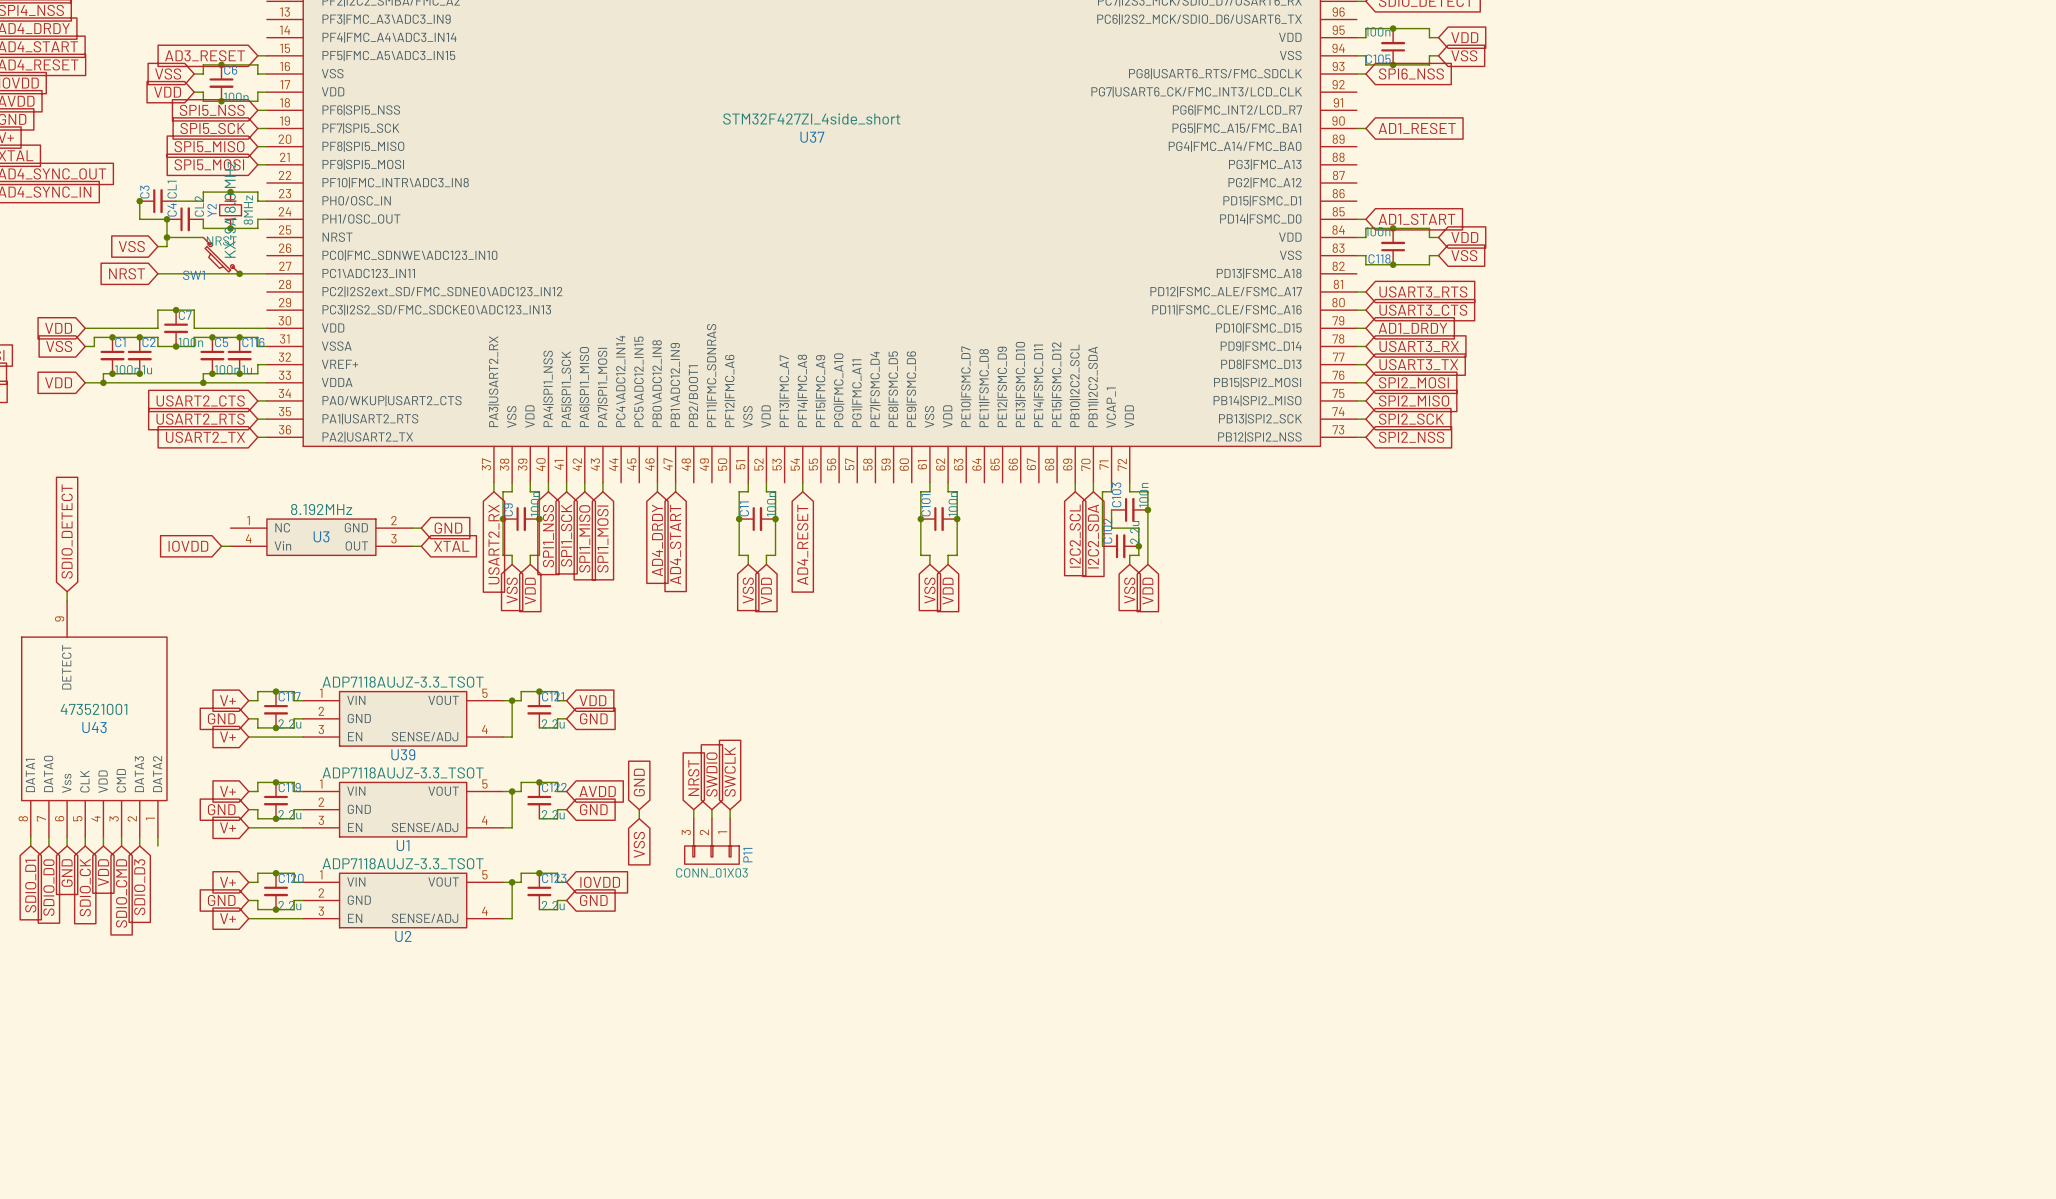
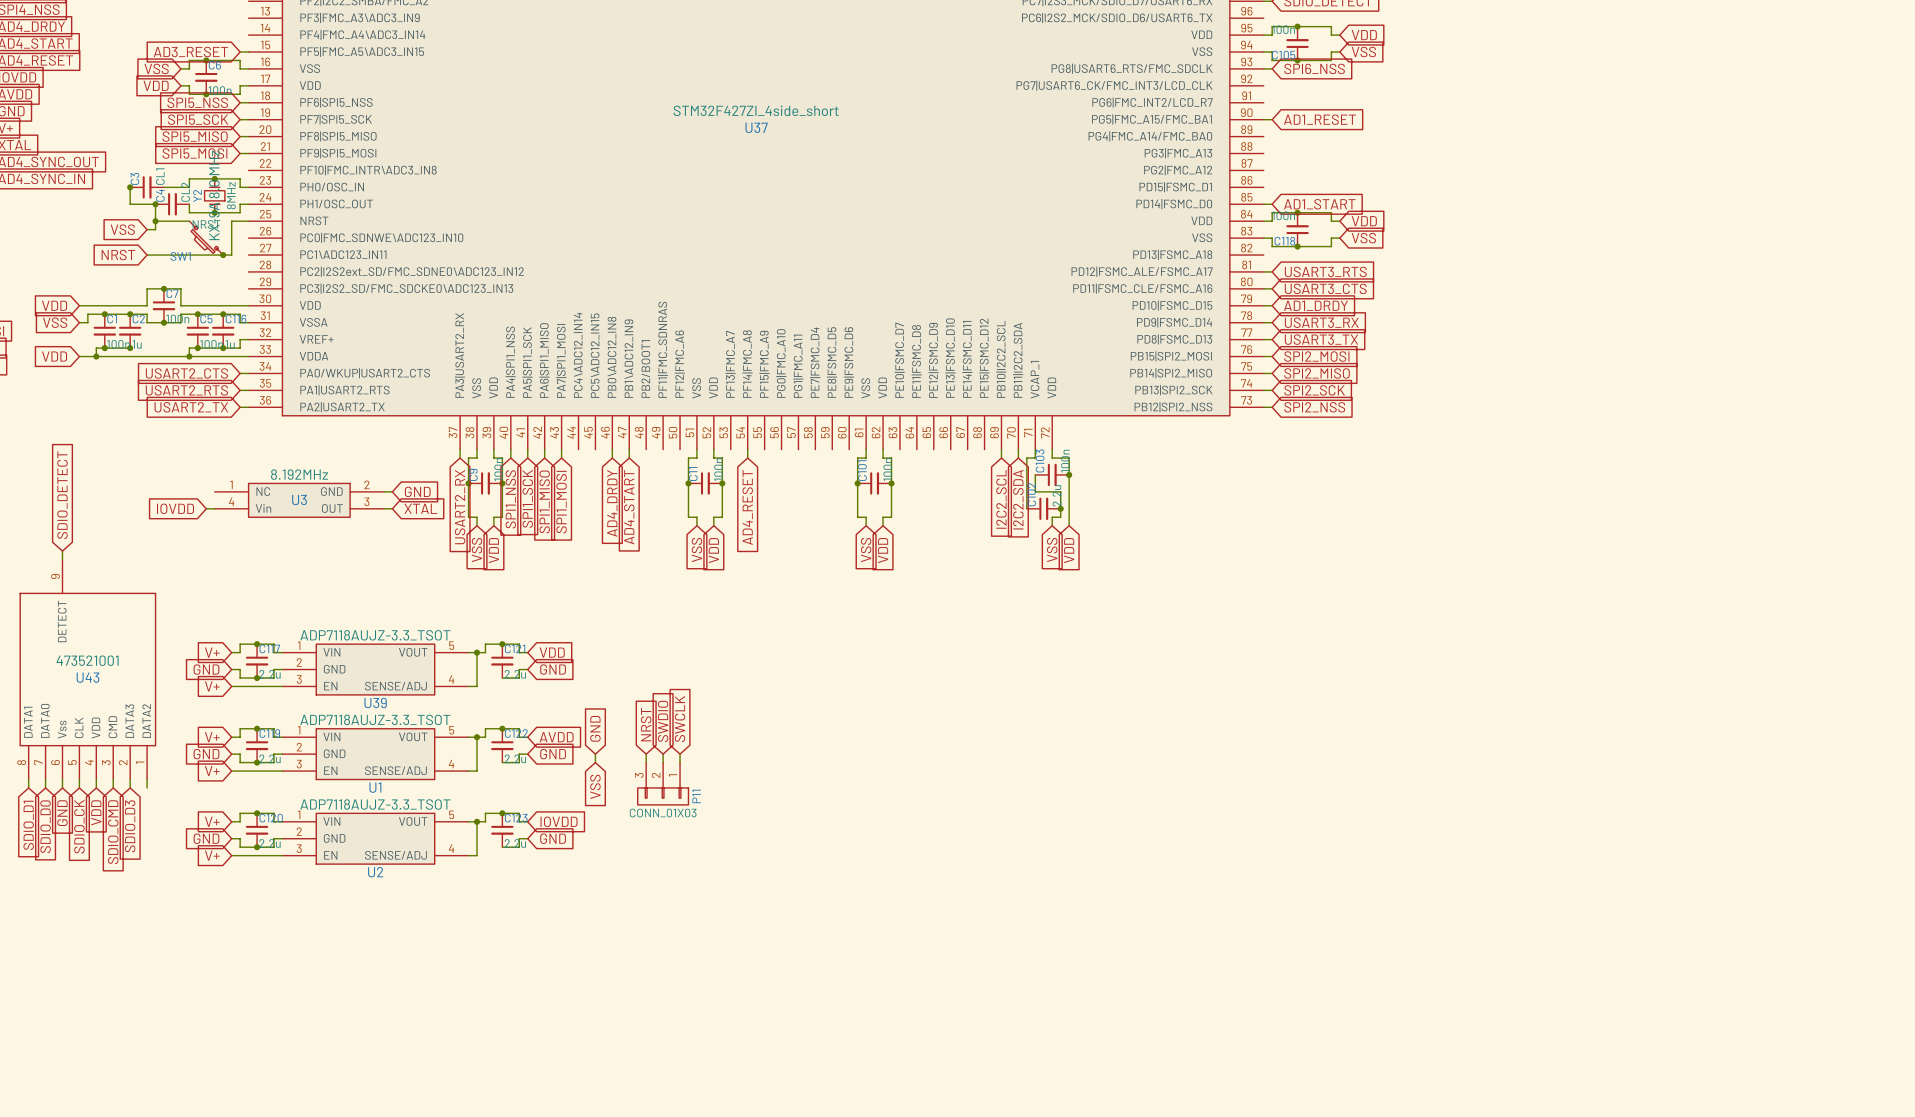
wire: (248, 273) (266, 273) -> (231, 255) (231, 221) (248, 221)

